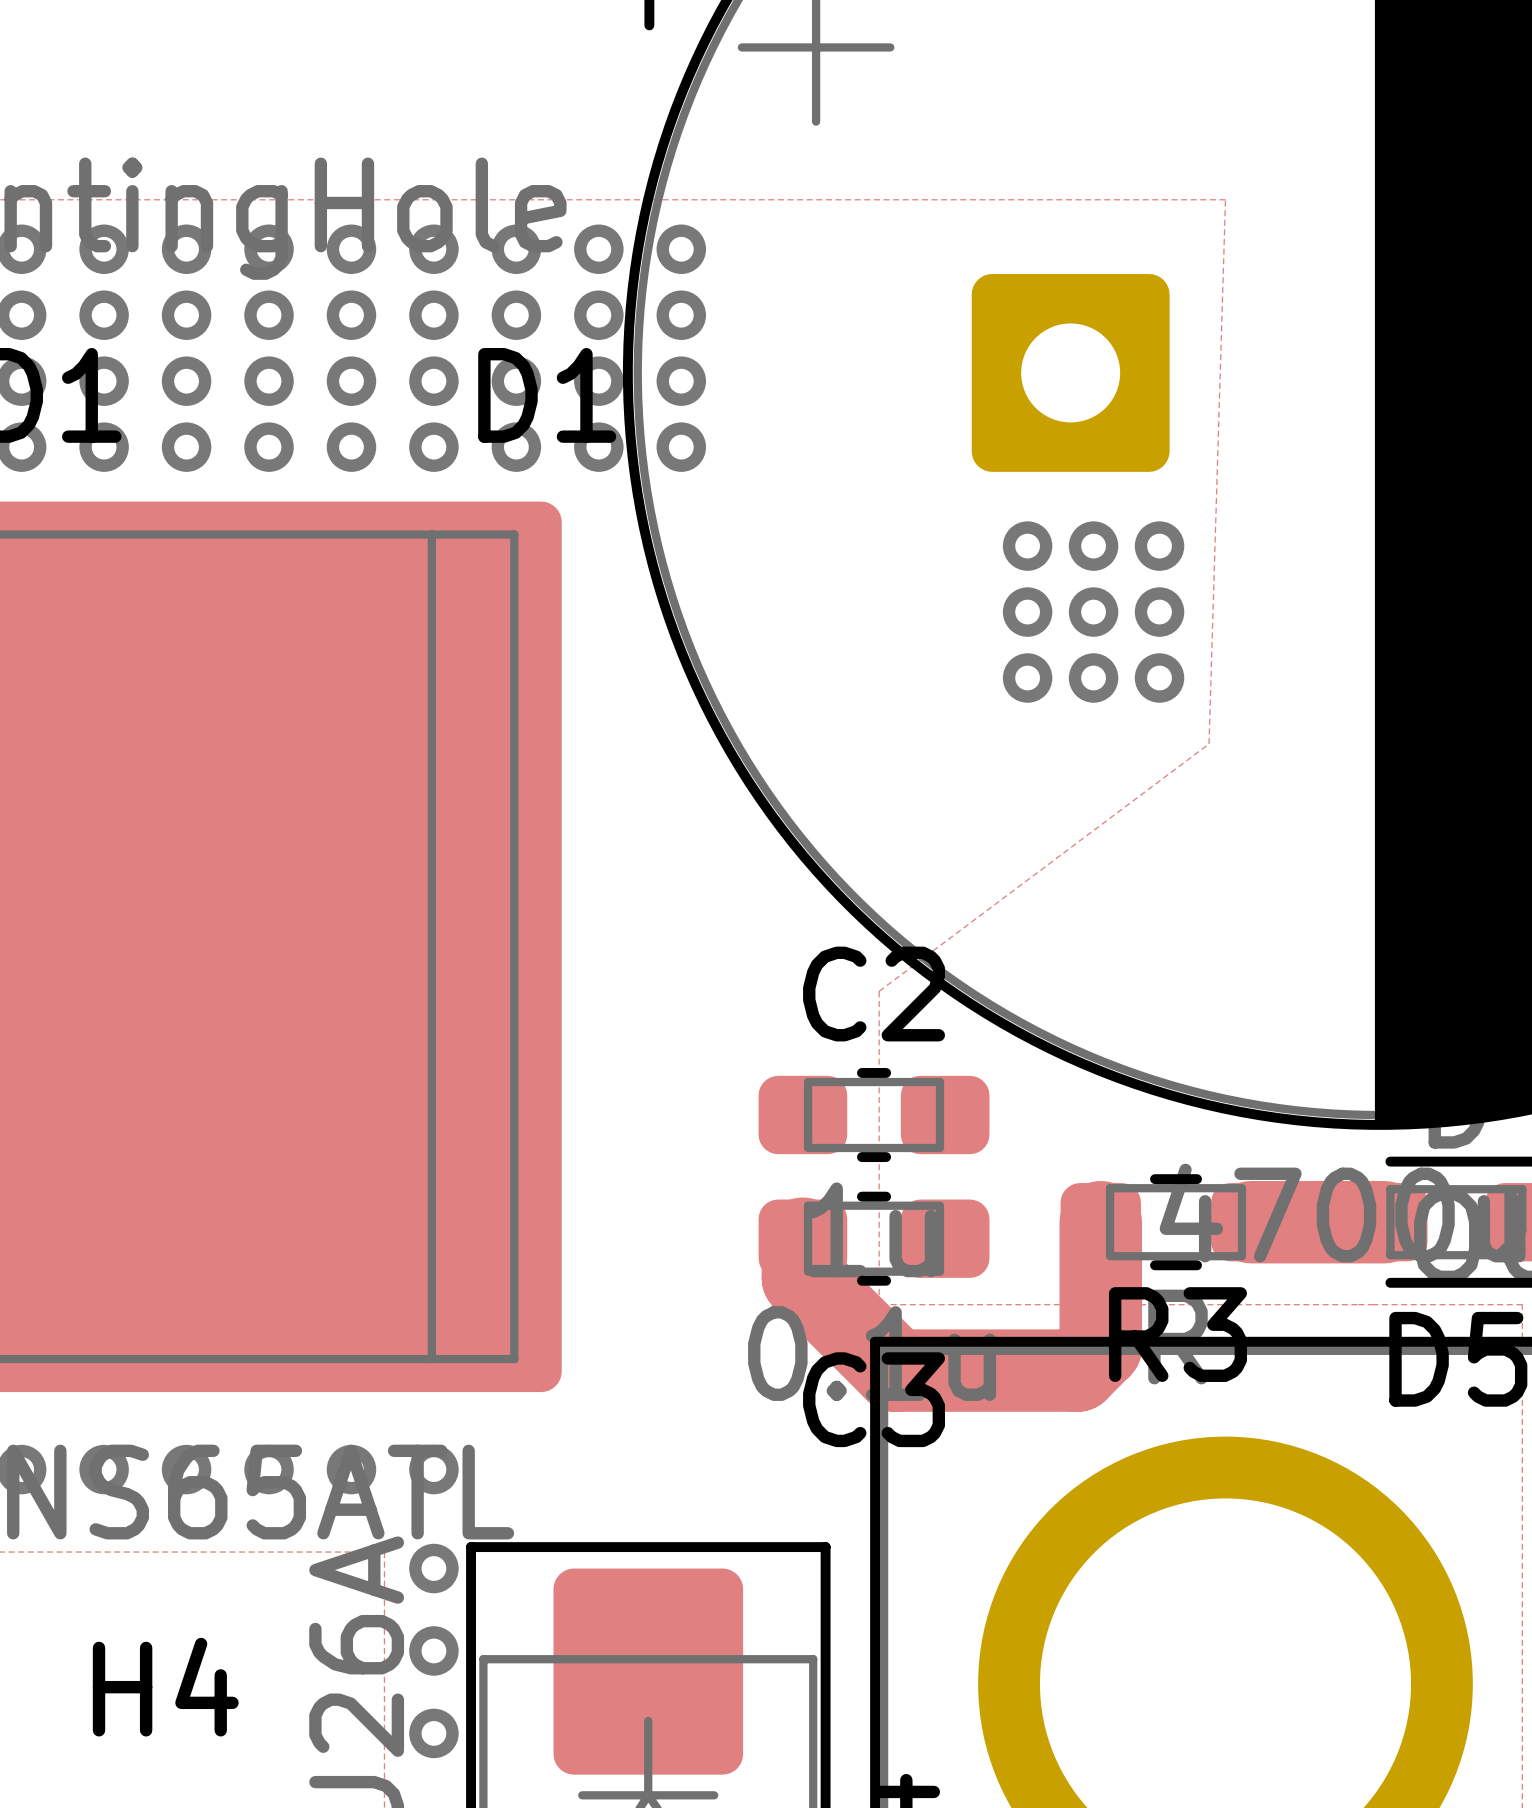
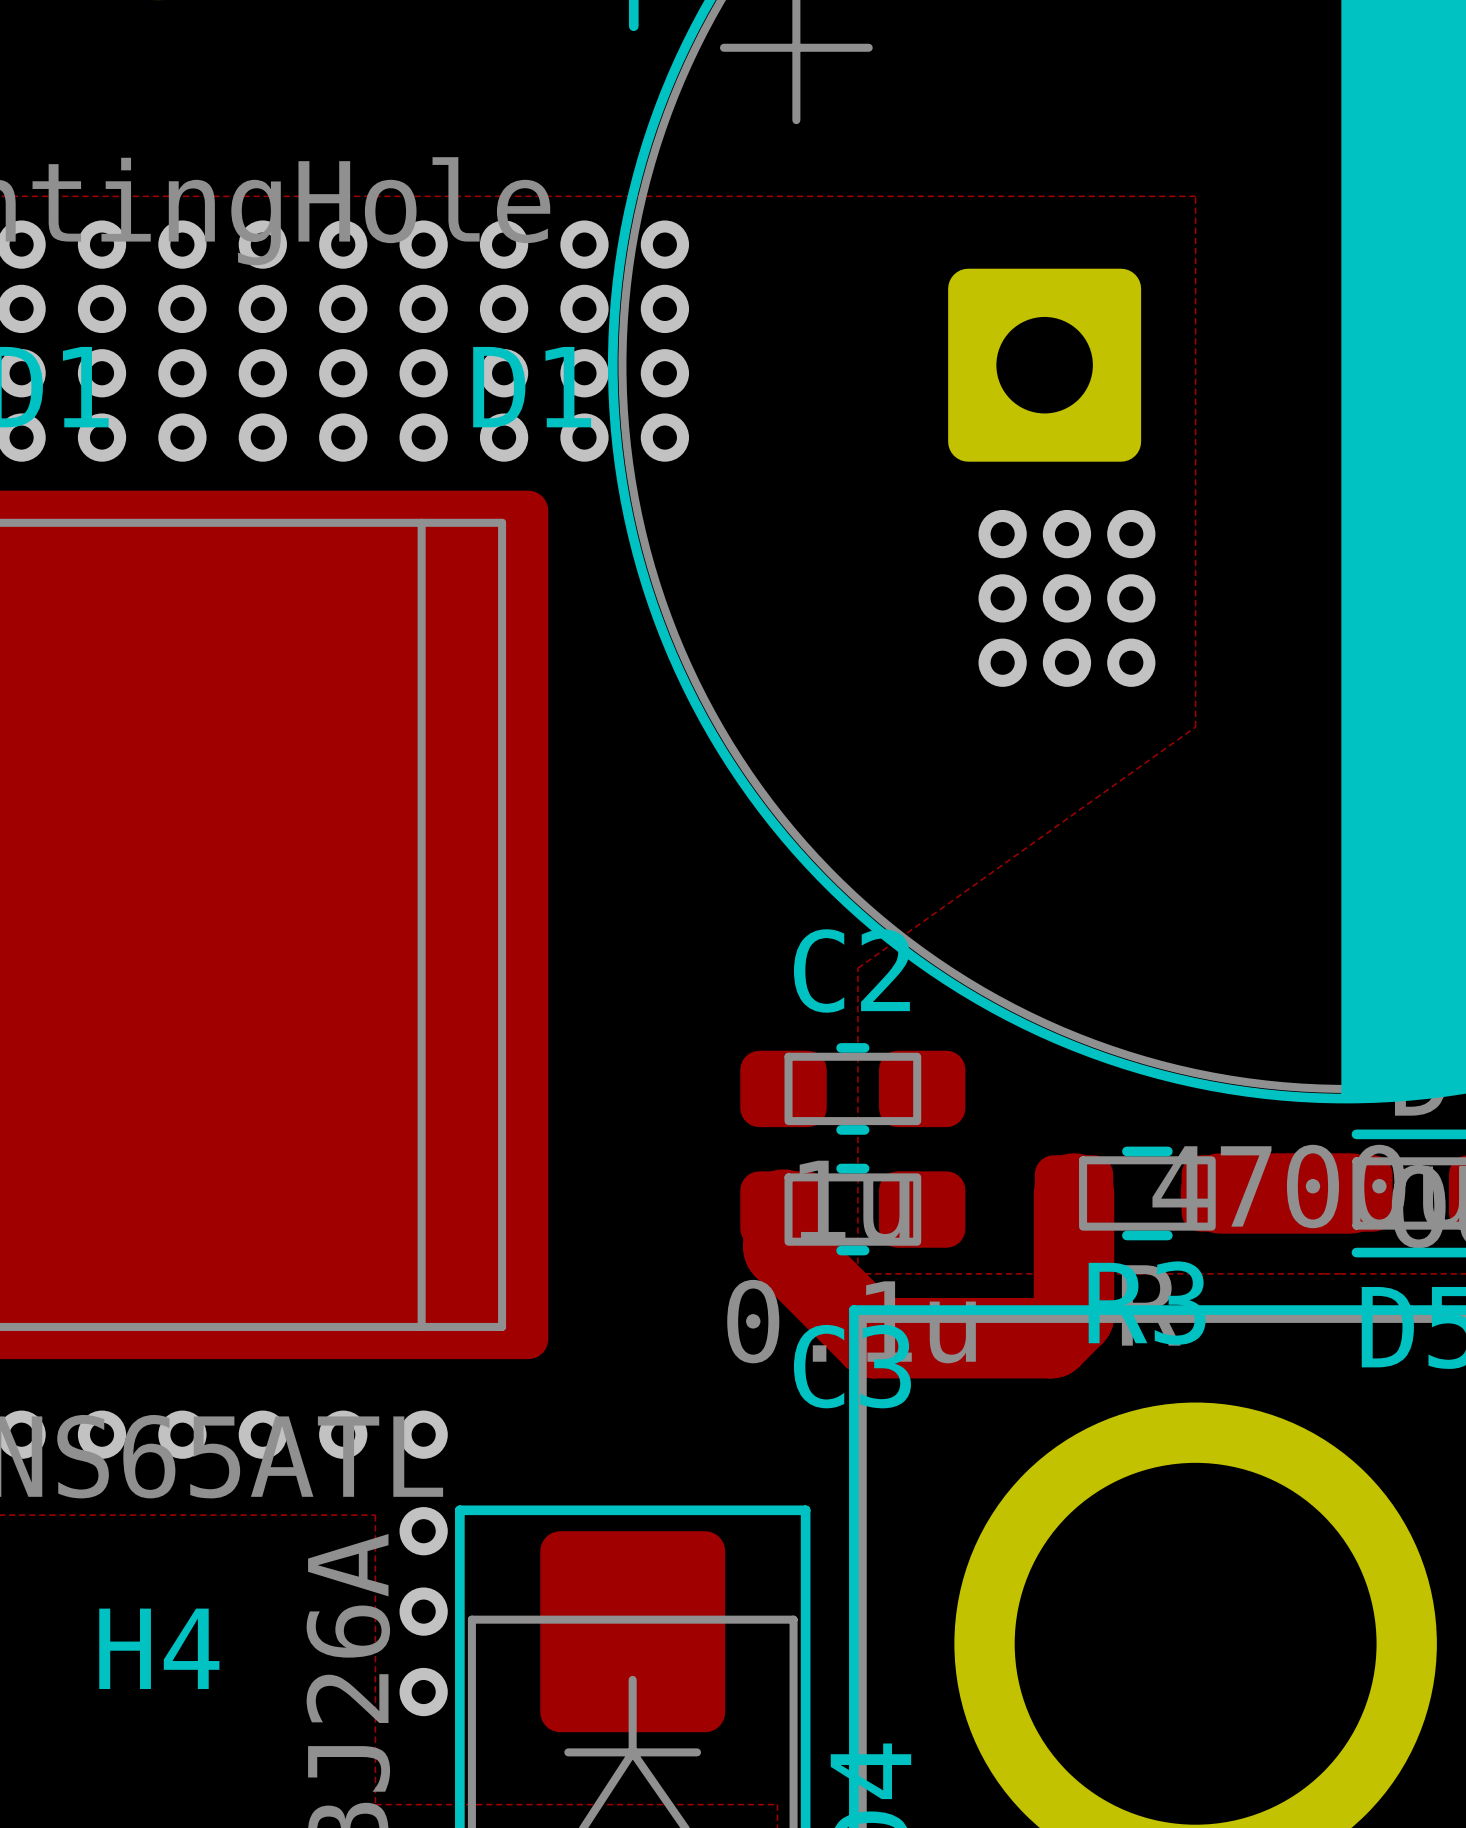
zone outline: (1225, 199) (1209, 743) (879, 991) -> (1195, 196) (1195, 727) (857, 968)

